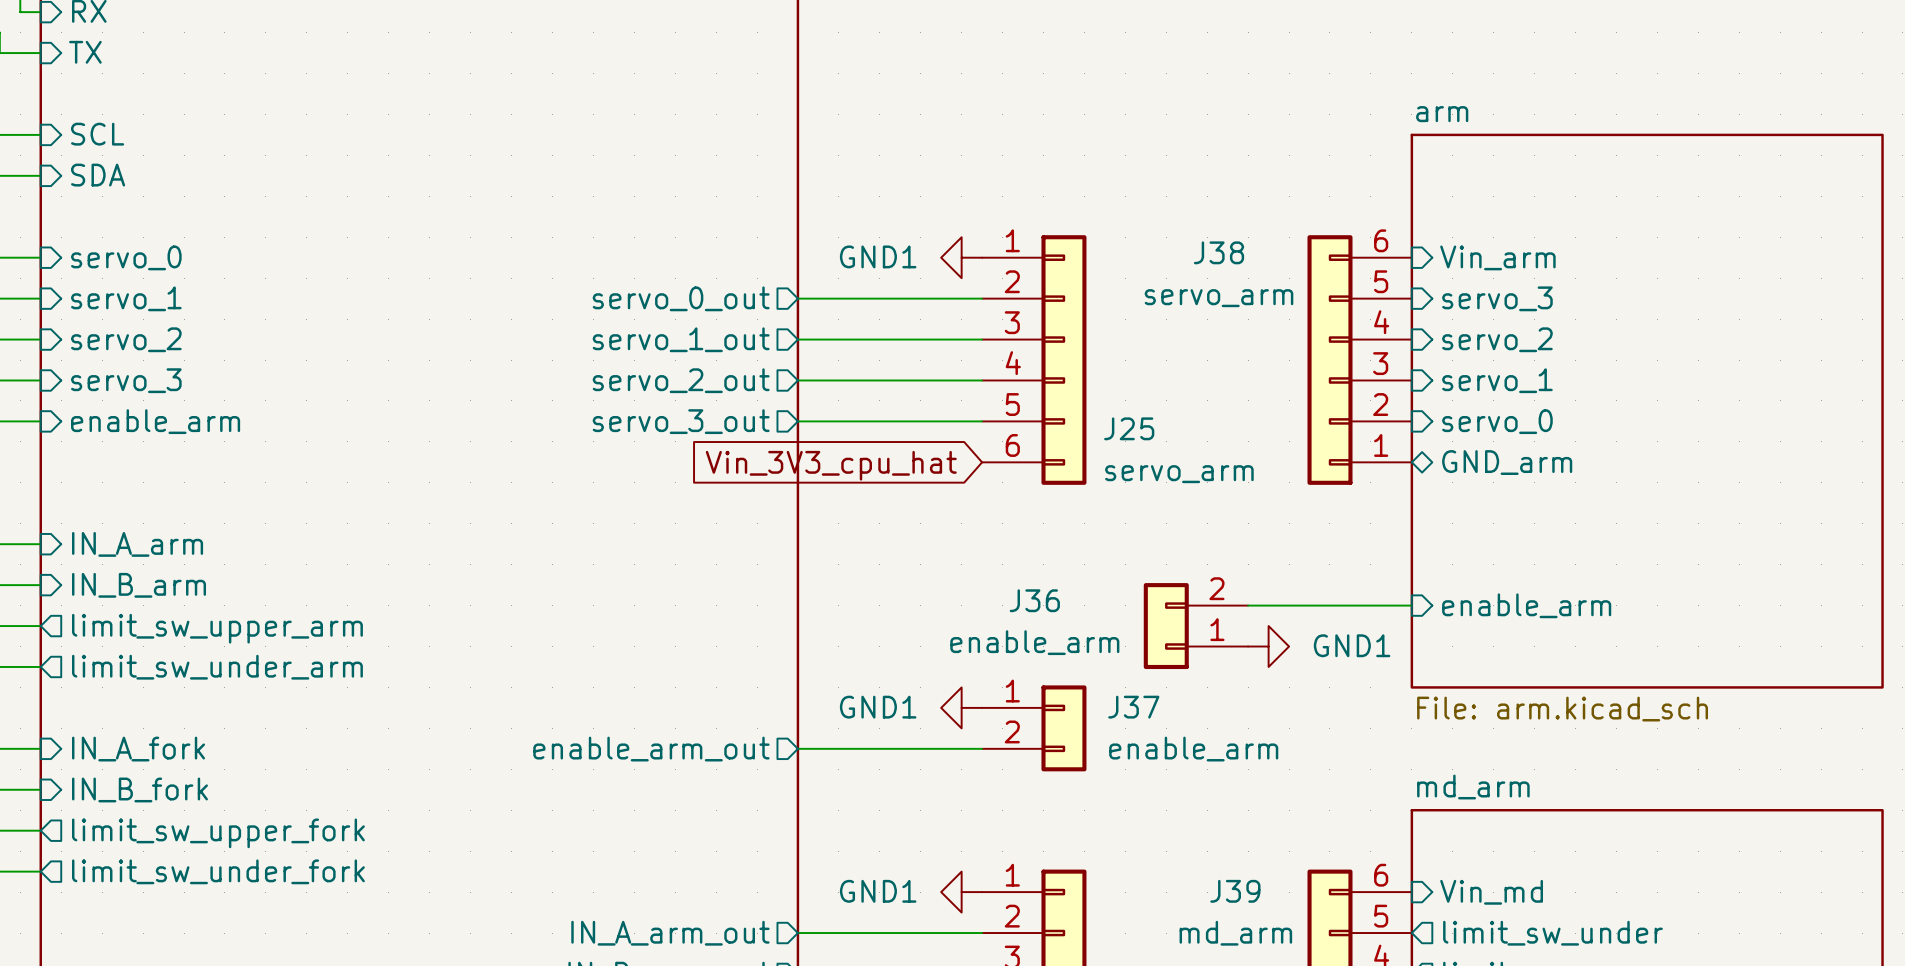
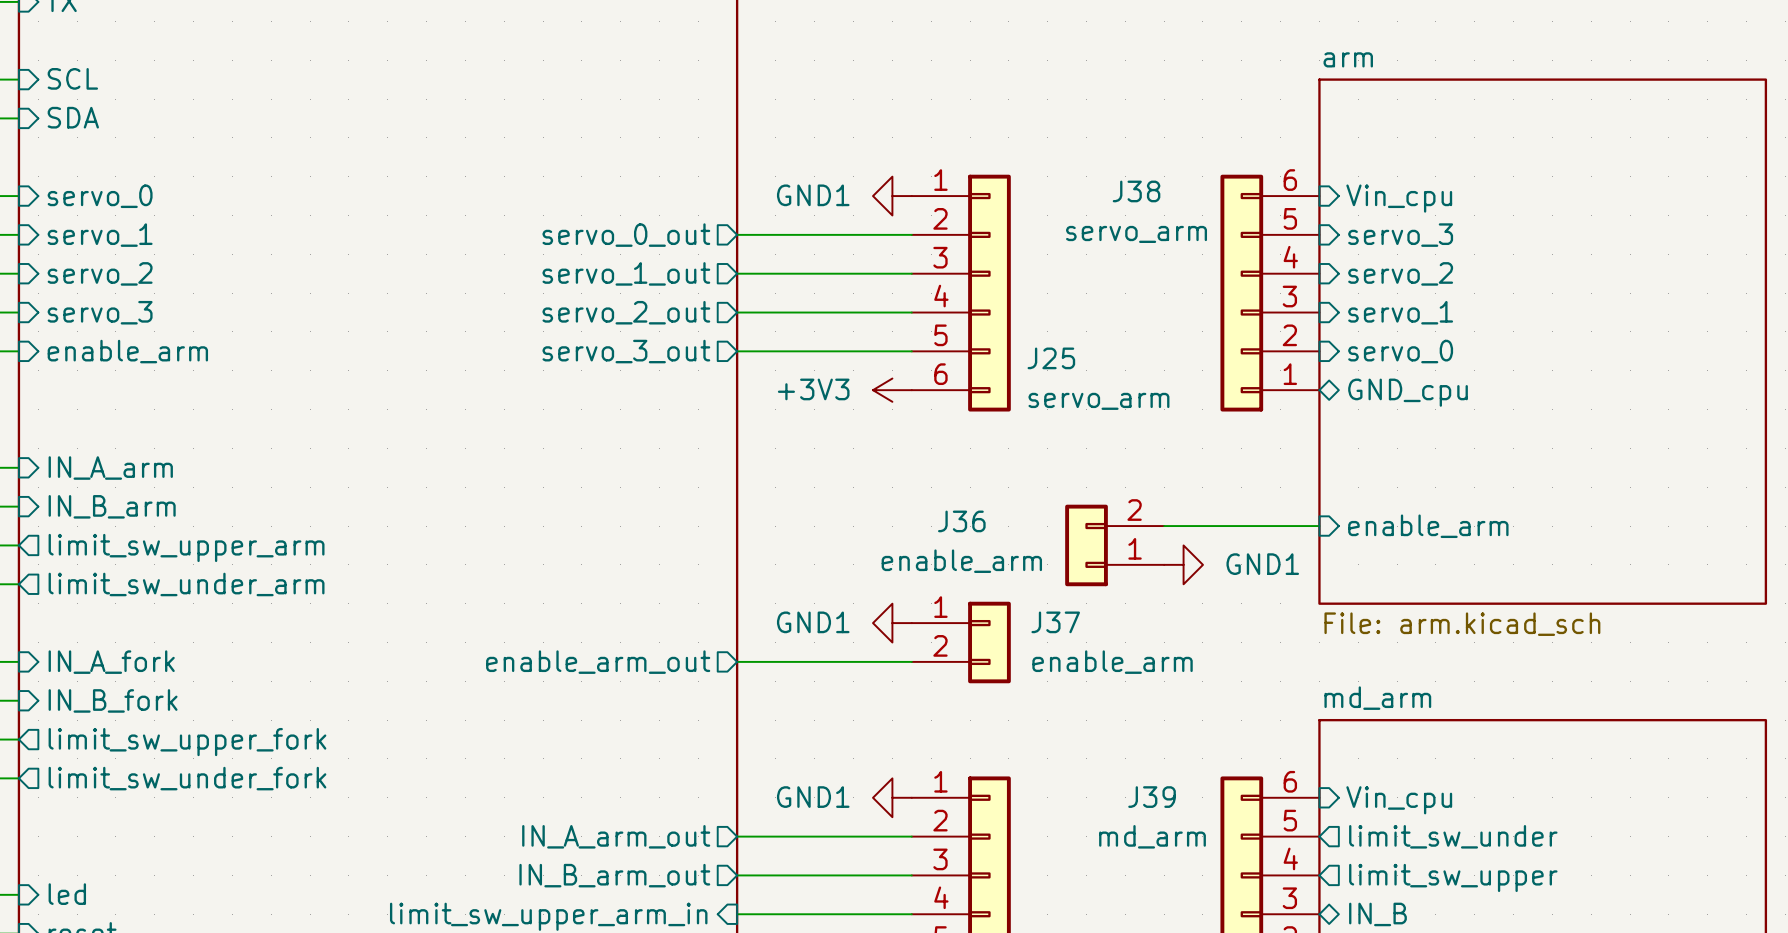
sheet pin: Vin_arm (1497, 257) -> Vin_cpu (1399, 198)
power symbol: none -> +3V3 (892, 390)
sheet pin: GND_arm (1507, 462) -> GND_cpu (1408, 392)
global label: Vin_3V3_cpu_hat (831, 465) -> none
sheet pin: Vin_md (1491, 892) -> Vin_cpu (1399, 800)

